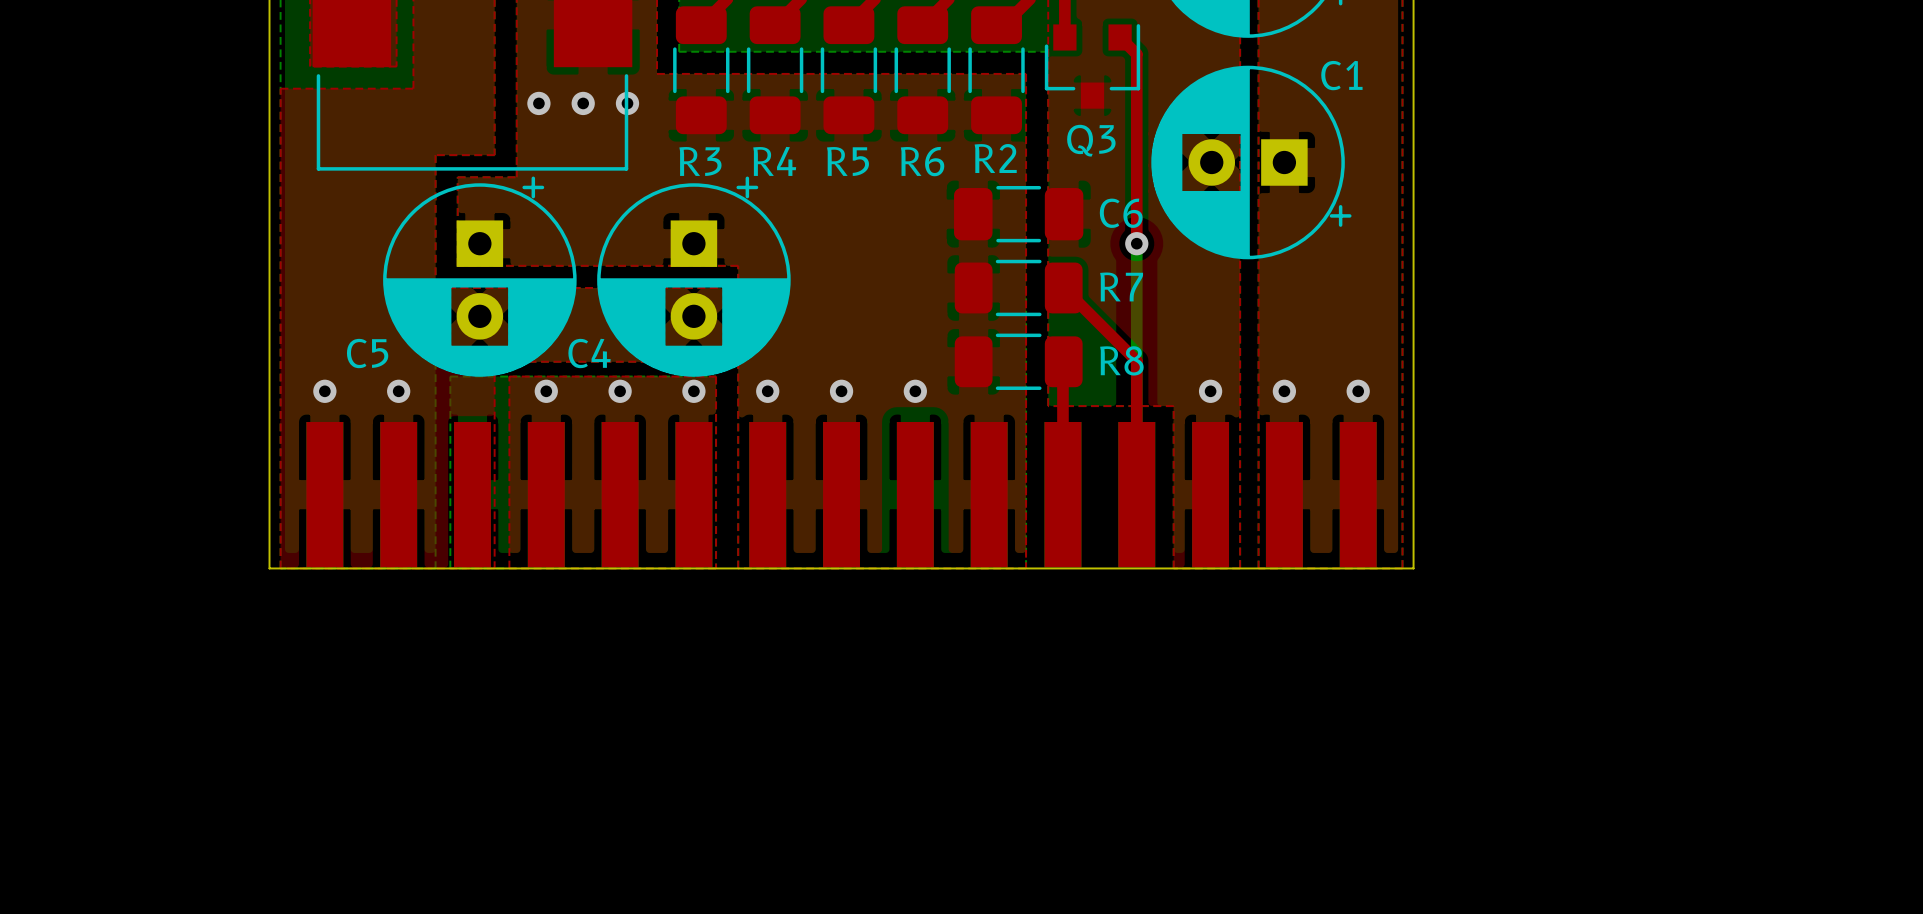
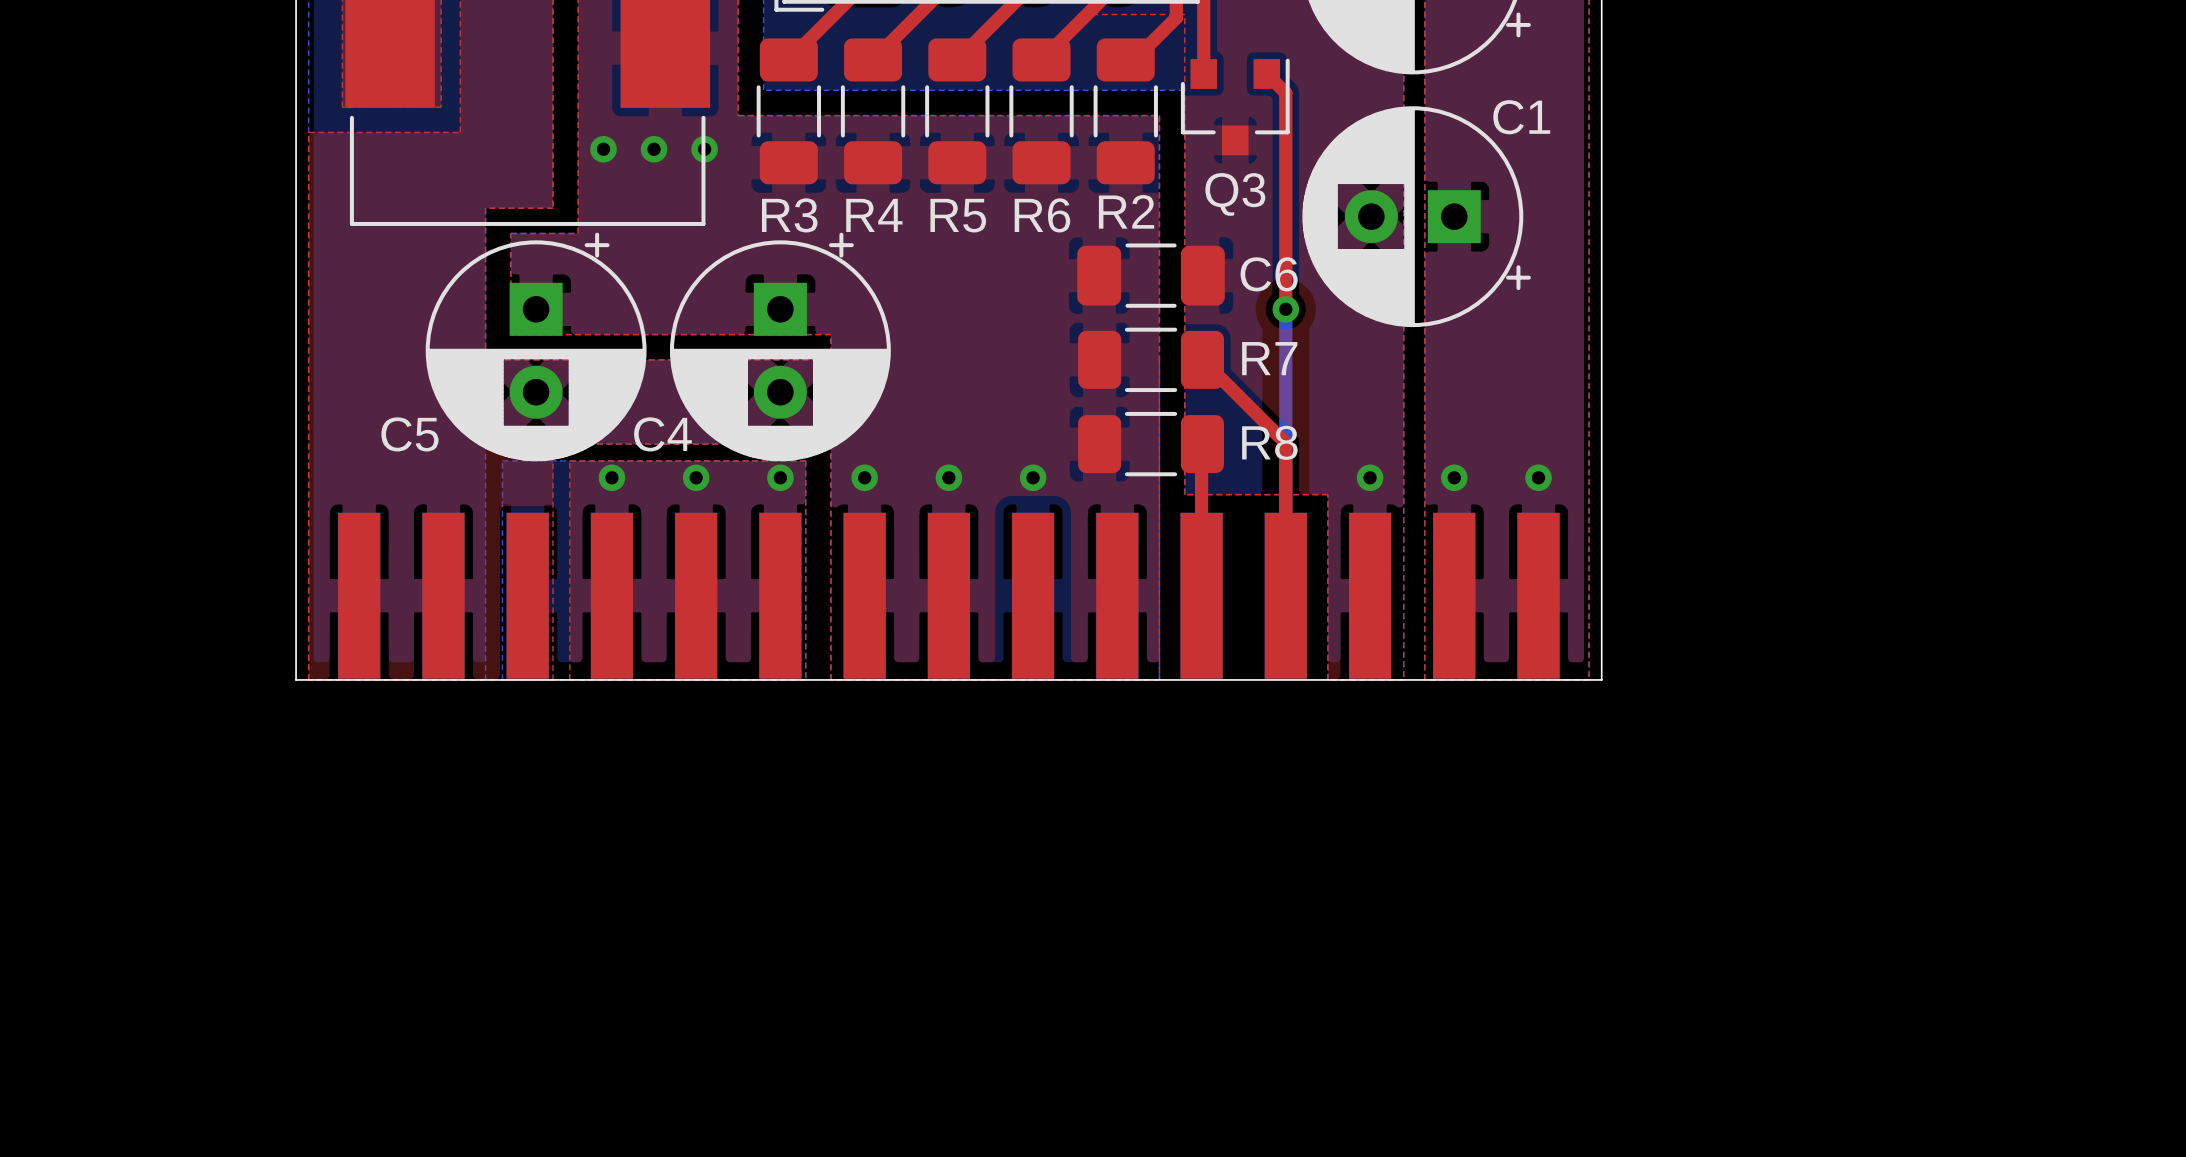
via: (324, 391) -> none
via: (398, 391) -> none

